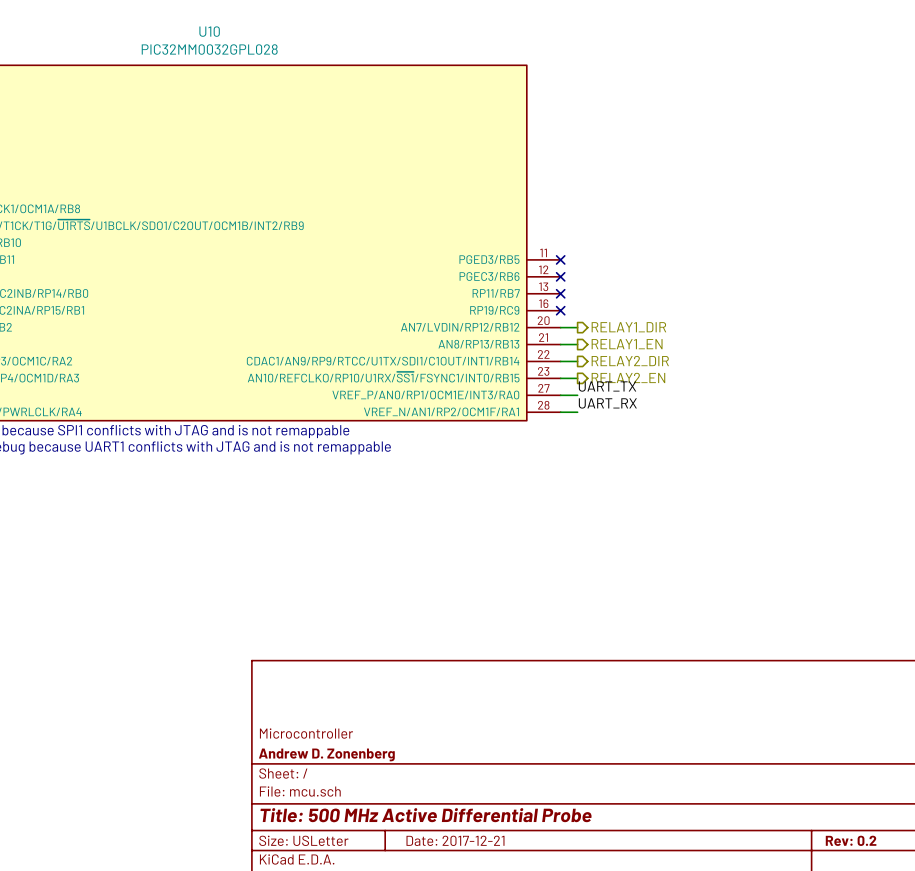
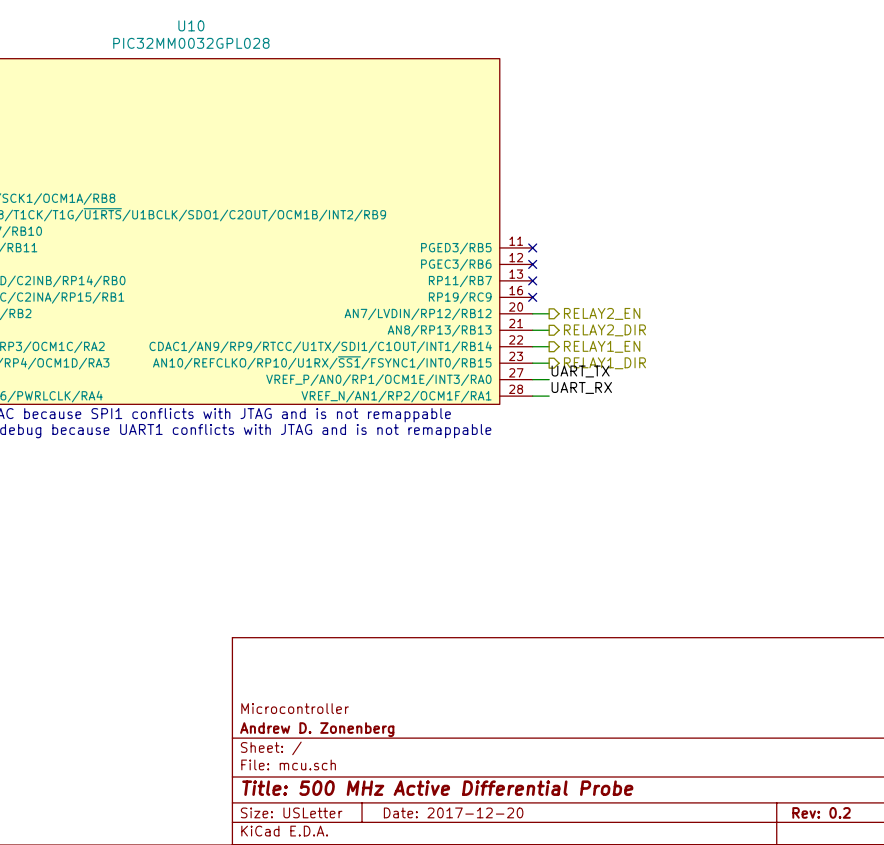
hierarchical label: RELAY1_DIR (628, 327) -> RELAY2_EN (602, 313)
hierarchical label: RELAY1_EN (627, 344) -> RELAY2_DIR (604, 330)
hierarchical label: RELAY2_DIR (630, 361) -> RELAY1_EN (602, 346)
hierarchical label: RELAY2_EN (628, 377) -> RELAY1_DIR (604, 363)
title block: Date: 2017-12-21 (455, 840) -> Date: 2017-12-20 (453, 812)

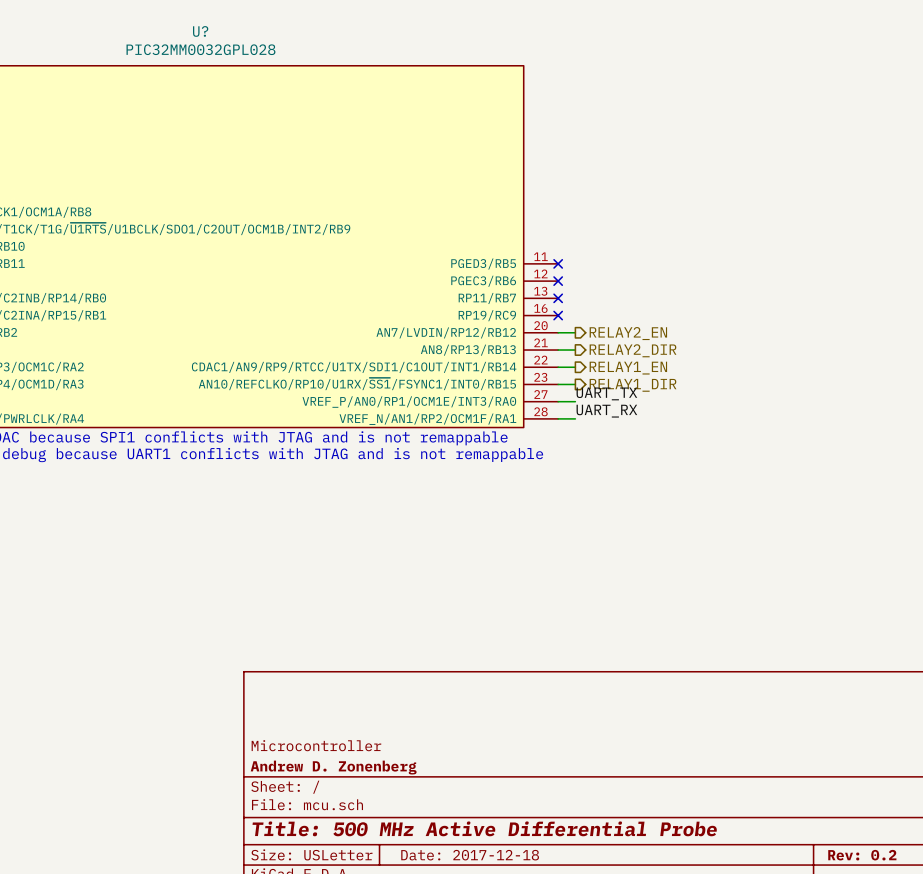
U10 name: U10 (191, 25) -> U? (200, 31)
title block: Date: 2017-12-20 (453, 812) -> Date: 2017-12-18 (470, 855)

